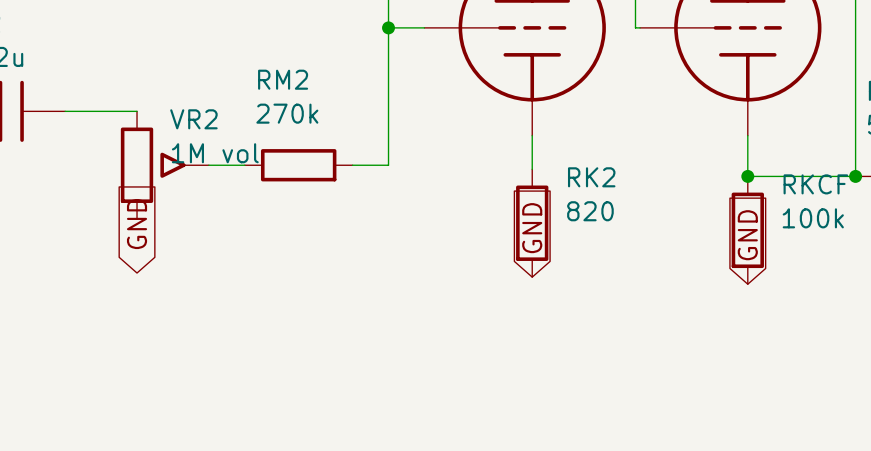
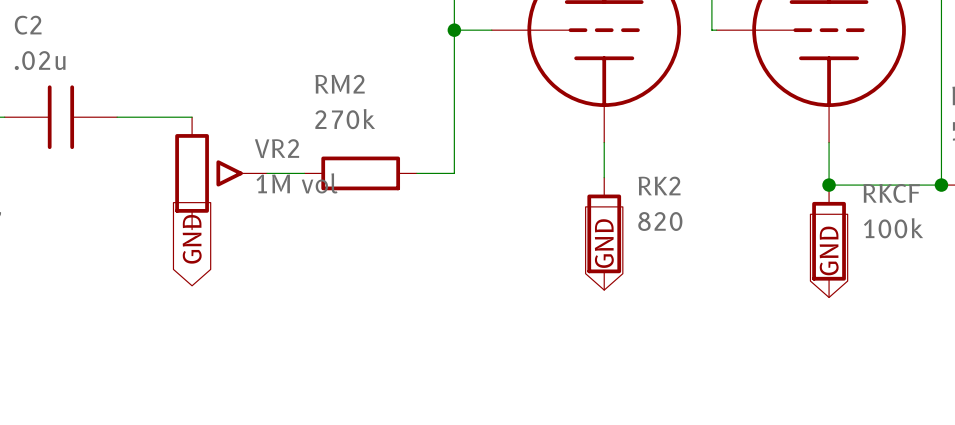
VR2 name position: VR2 (193, 119) -> VR2 (277, 148)
VR2 value position: 1M vol (215, 153) -> 1M vol (297, 183)

